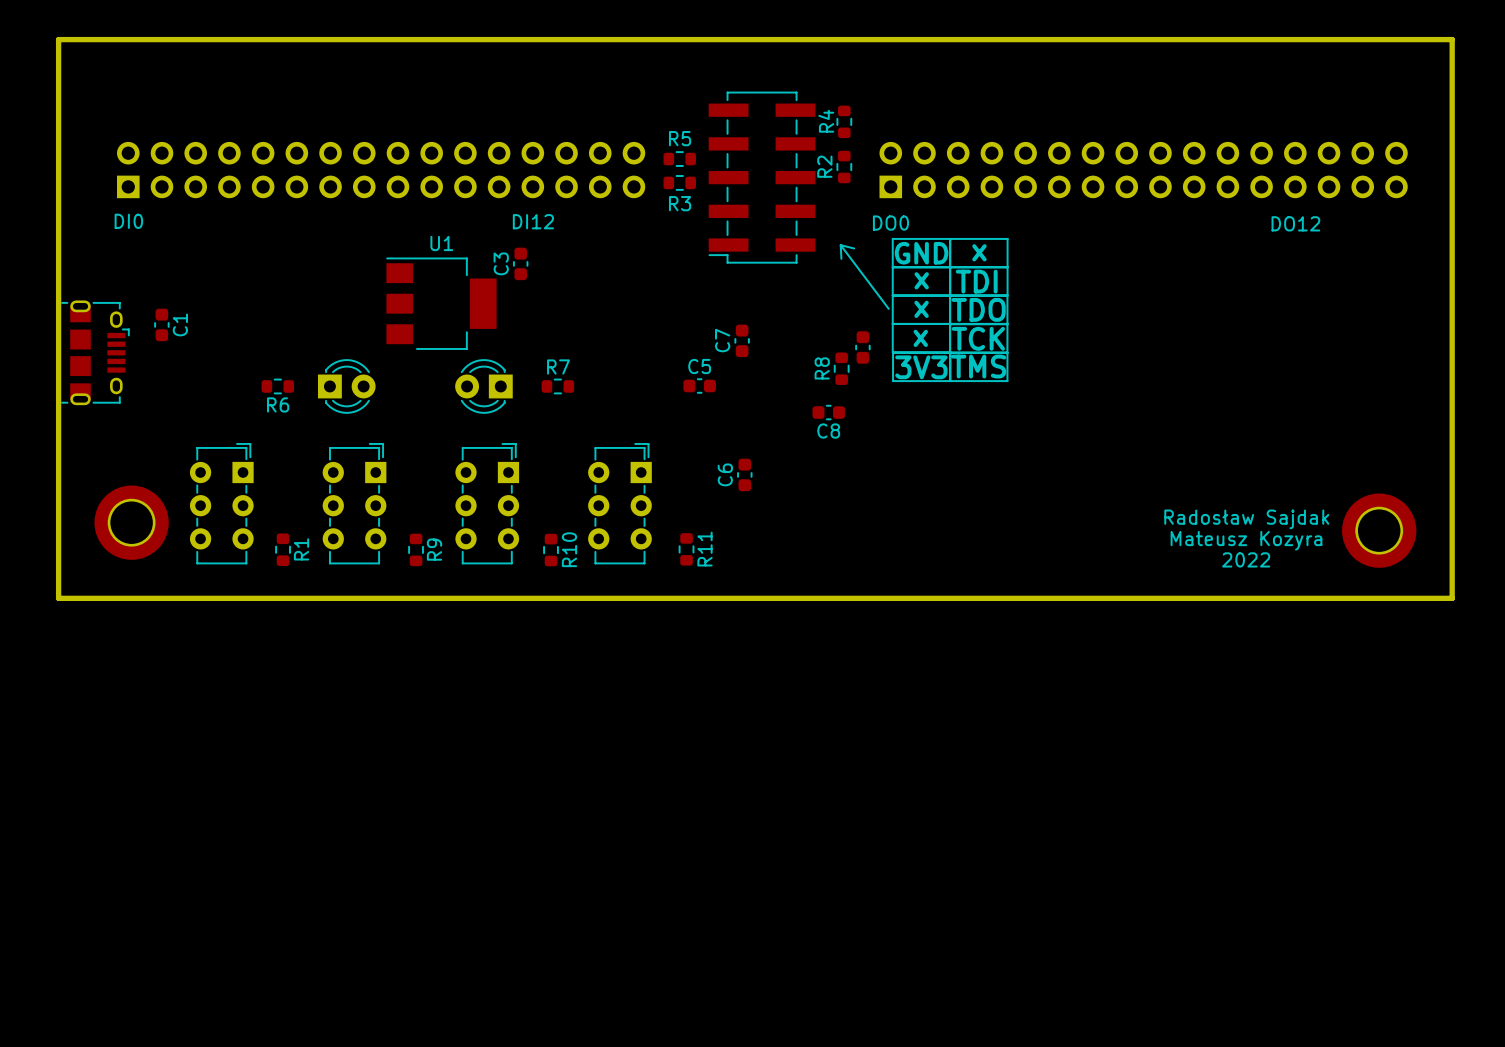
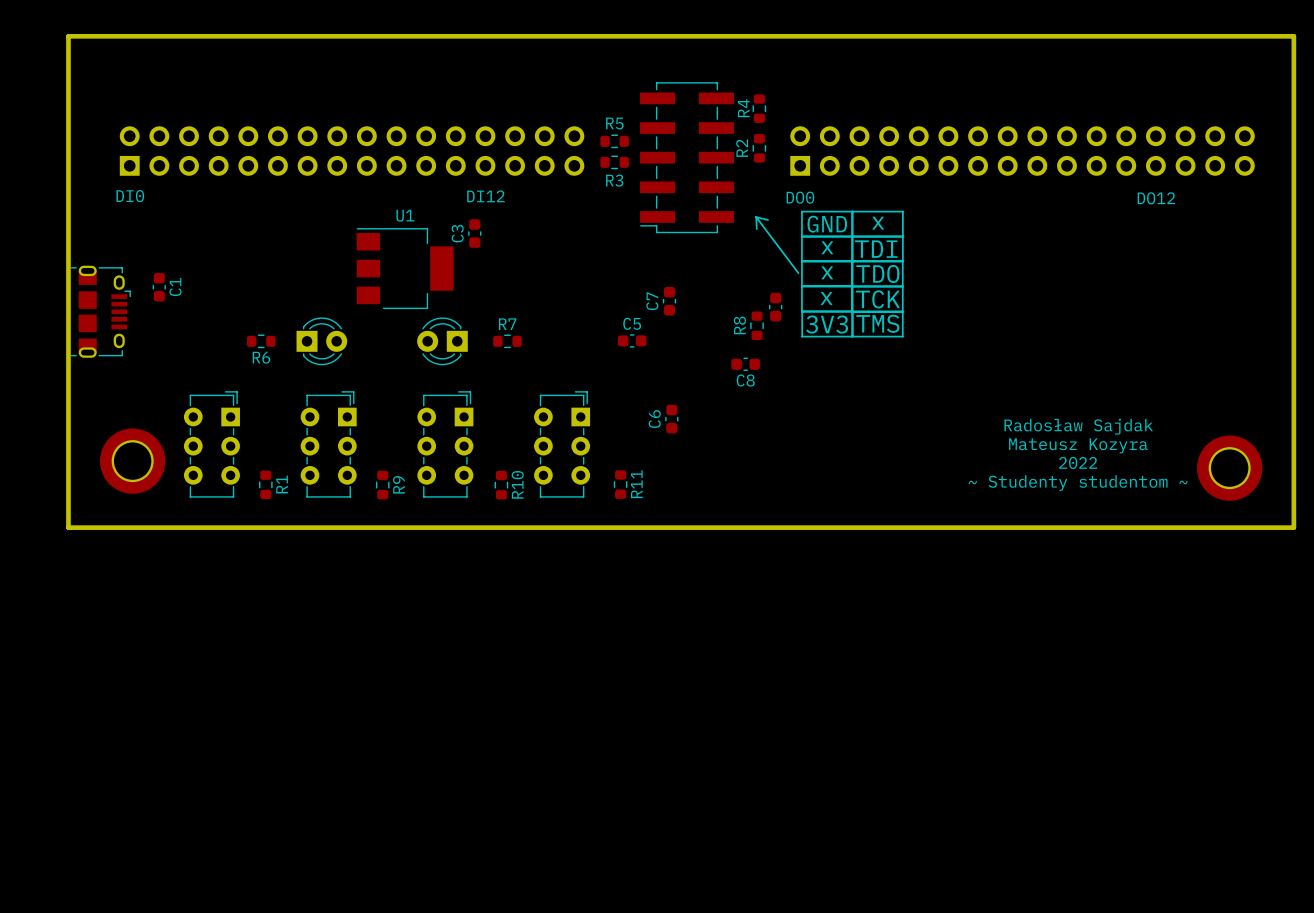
text position: Radosław Sajdak (1246, 519) -> Radosław Sajdak (1078, 426)
text position: Mateusz Kozyra (1246, 540) -> Mateusz Kozyra (1078, 445)
text: none -> ~ Studenty studentom ~ (1078, 483)
text position: 2022 (1246, 559) -> 2022 (1078, 462)

